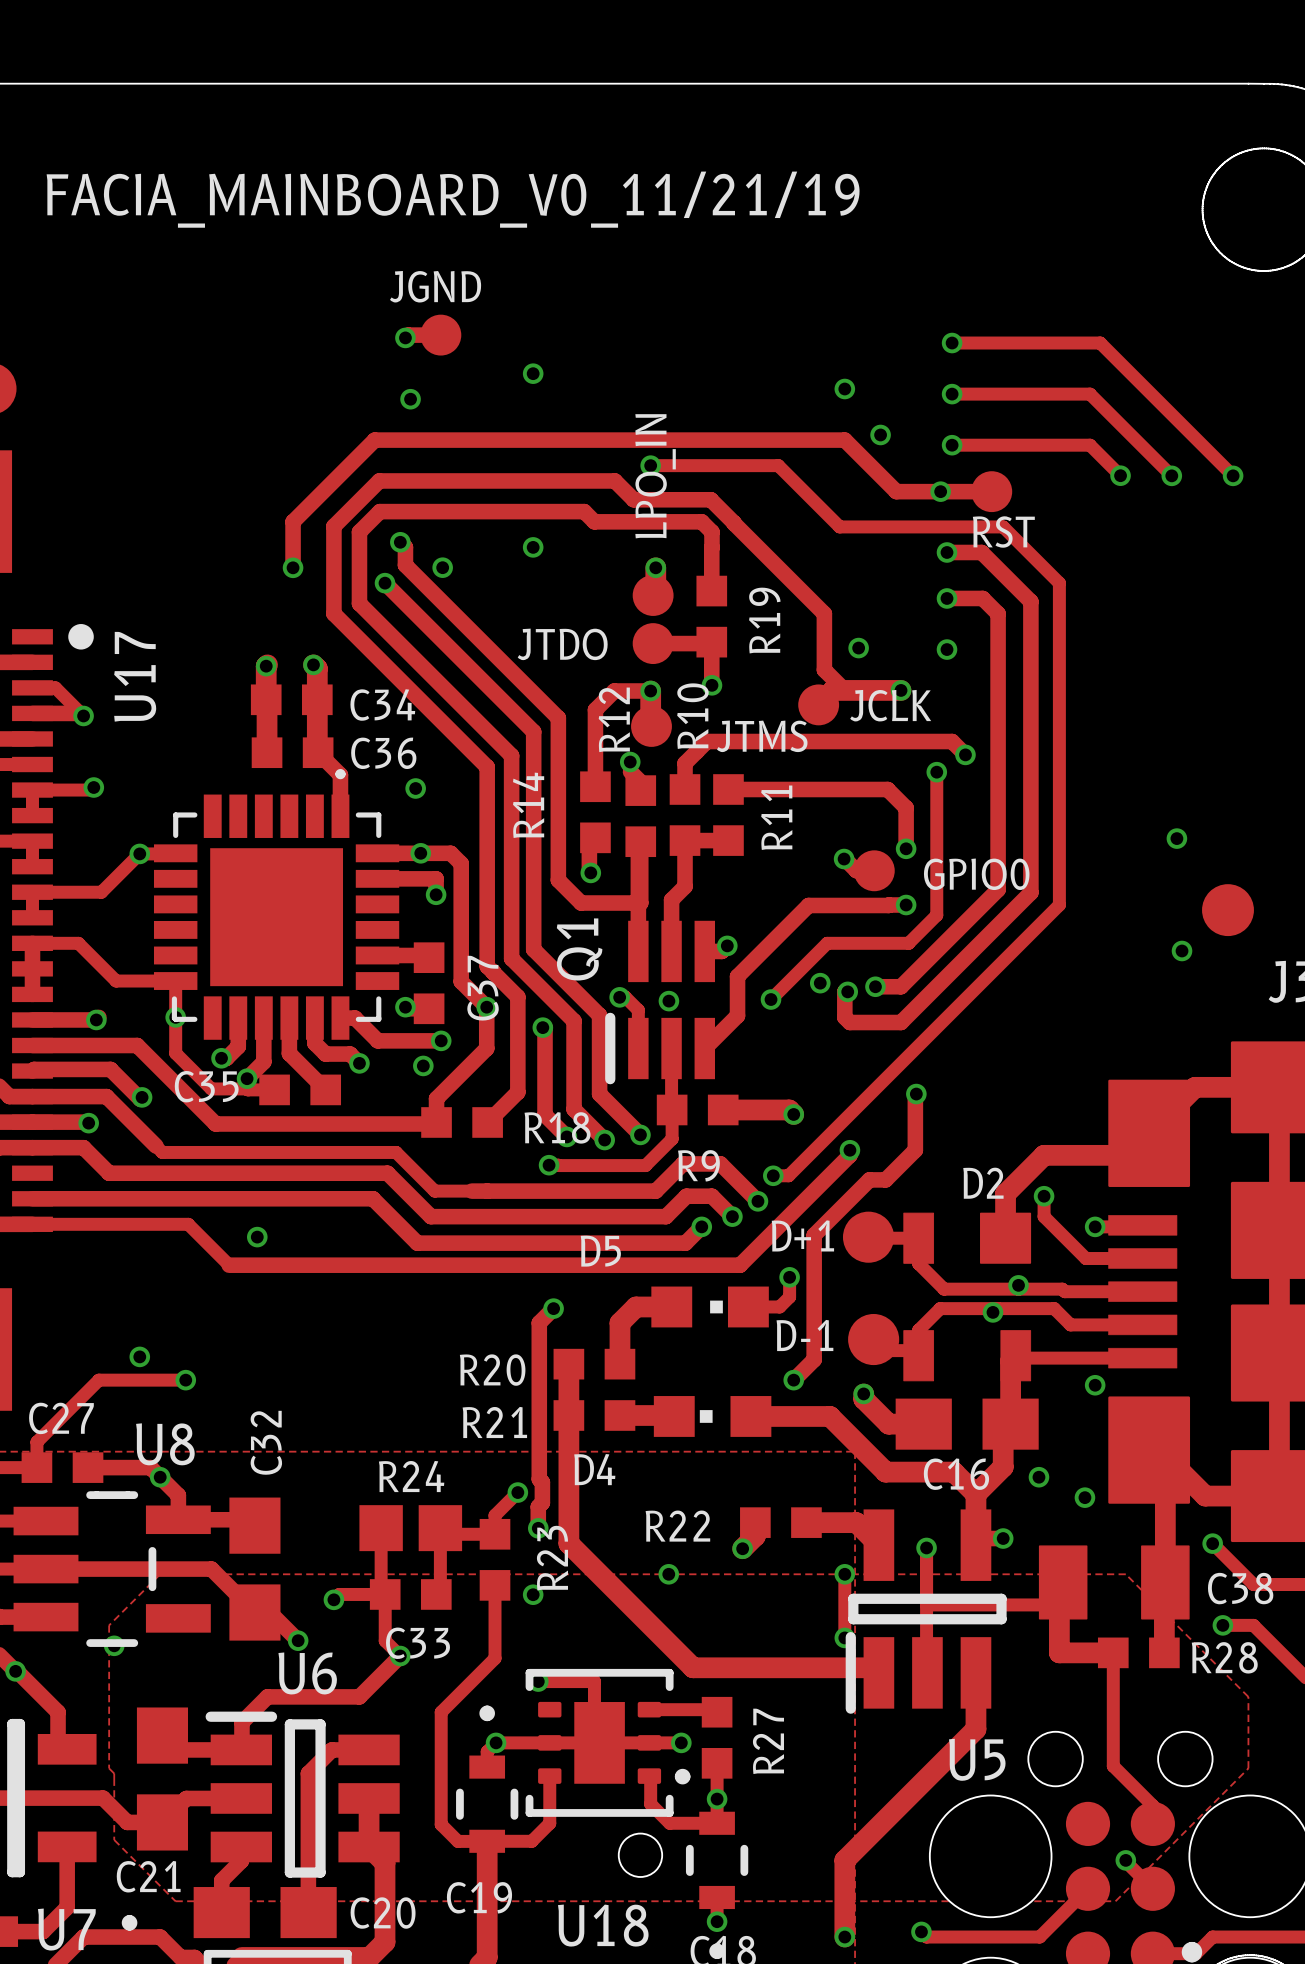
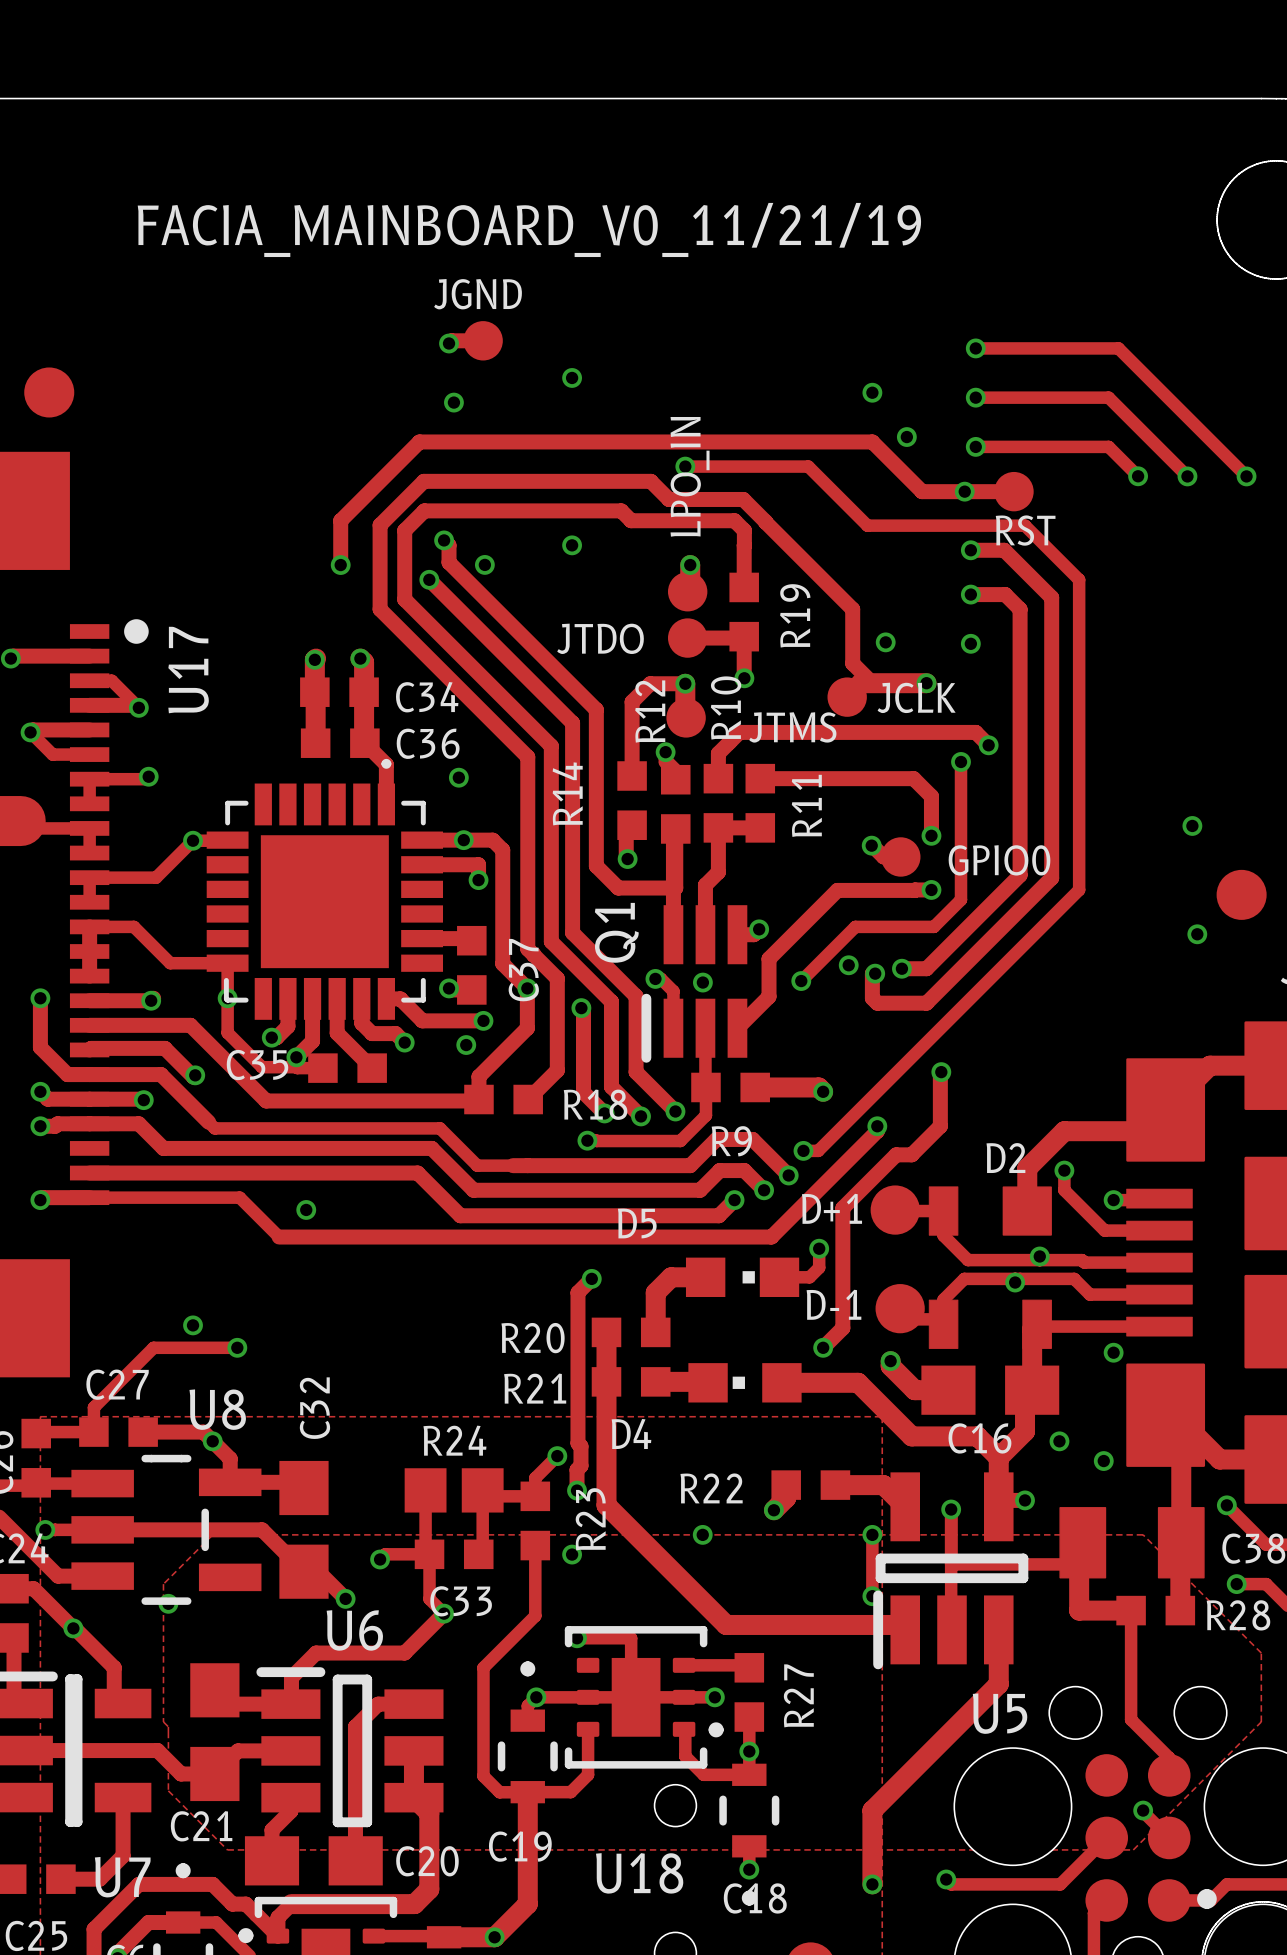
text position: FACIA_MAINBOARD_V0_11/21/19 (453, 199) -> FACIA_MAINBOARD_V0_11/21/19 (529, 229)

